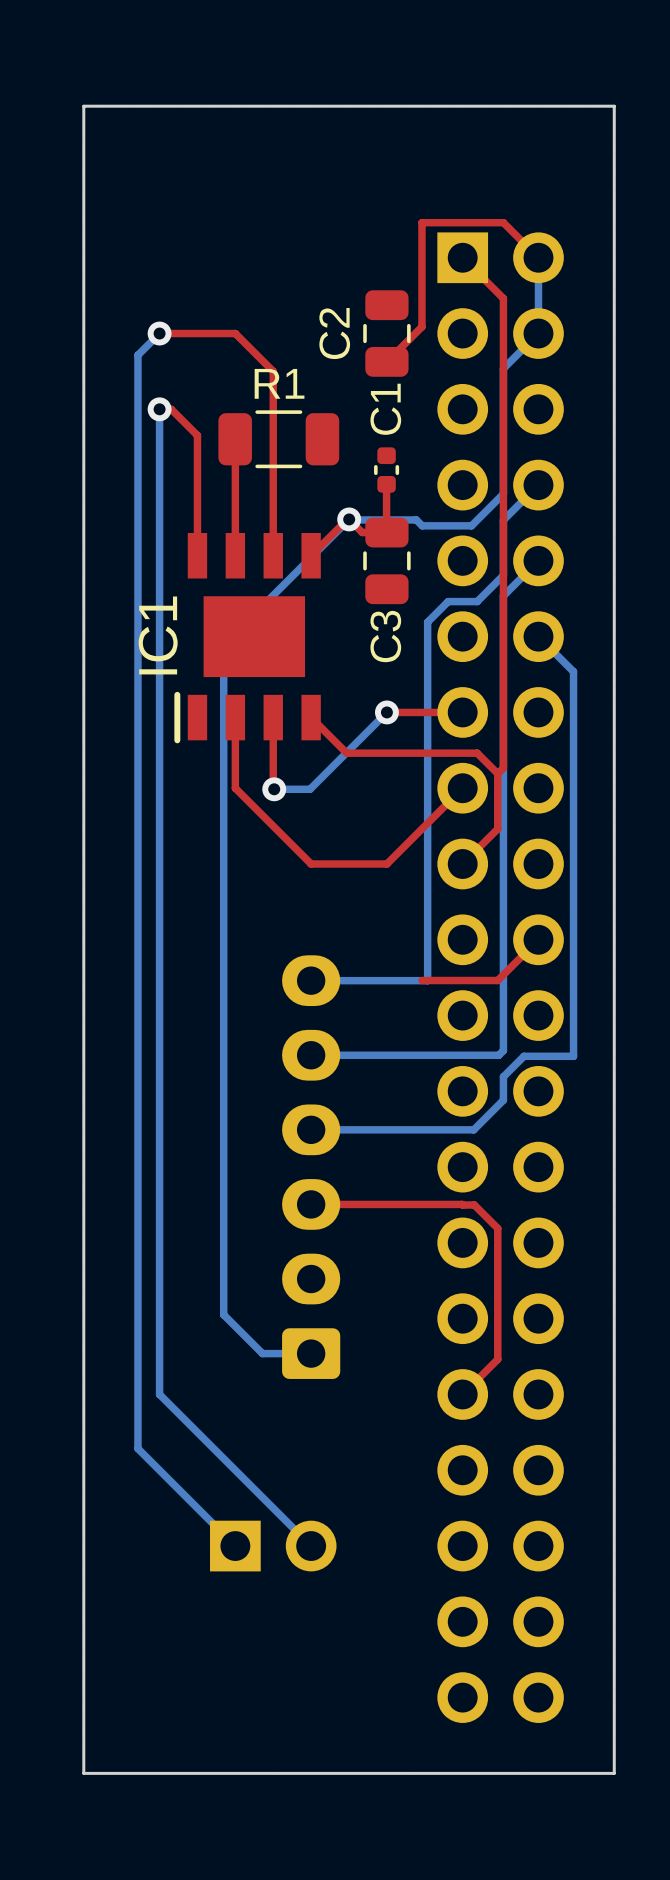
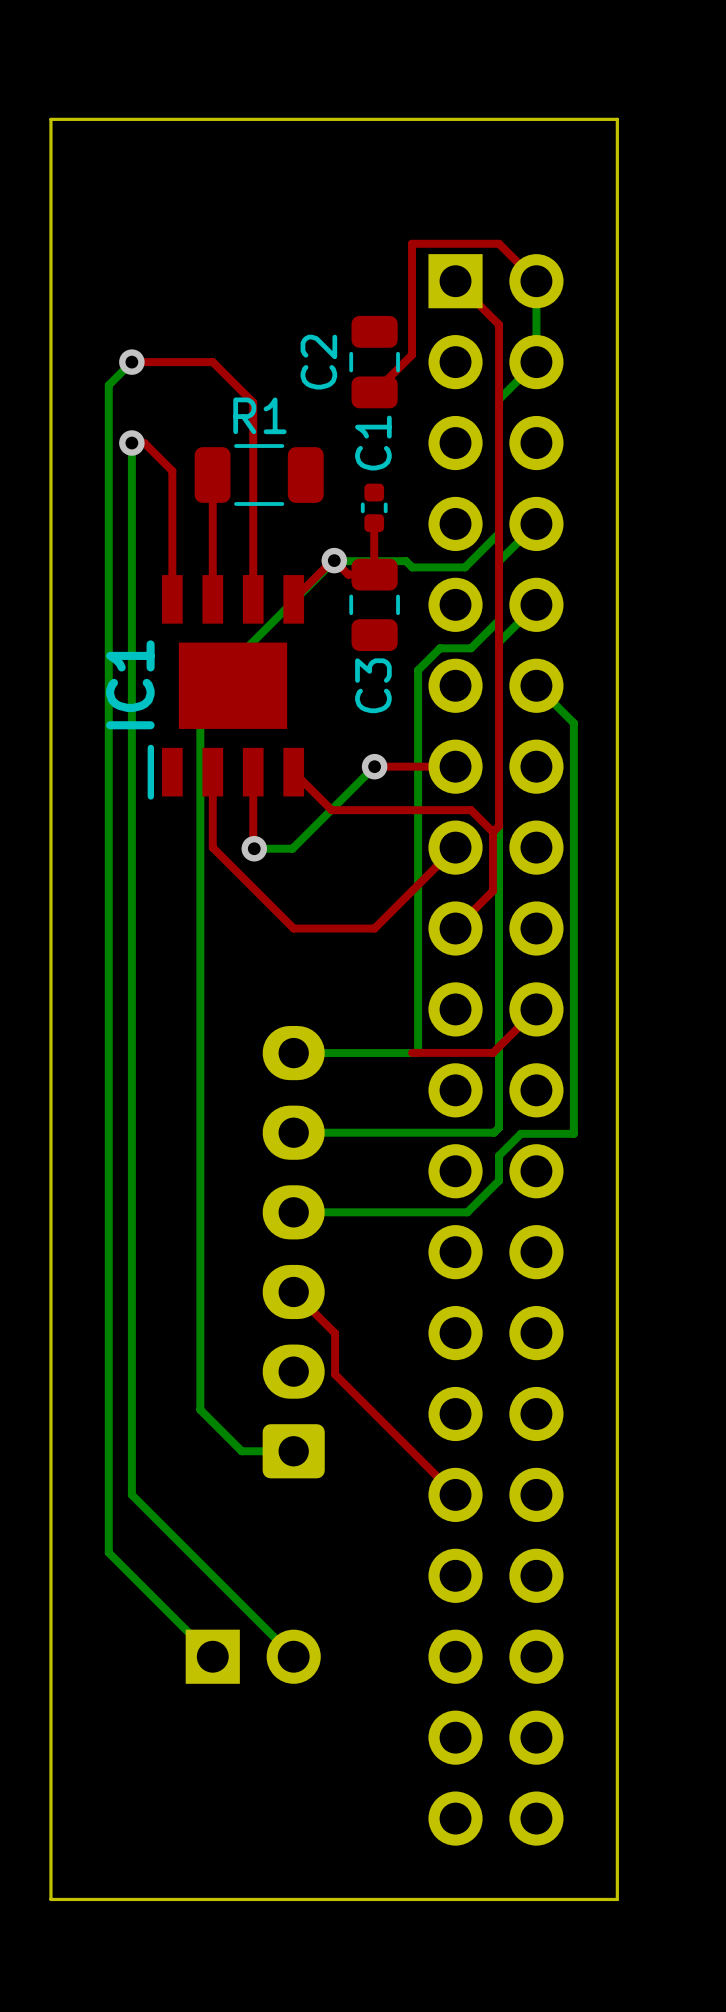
top track: (311, 1204) (474, 1205) (497, 1228) (497, 1359) (462, 1394) -> (293, 1291) (335, 1333) (335, 1374) (455, 1494)

